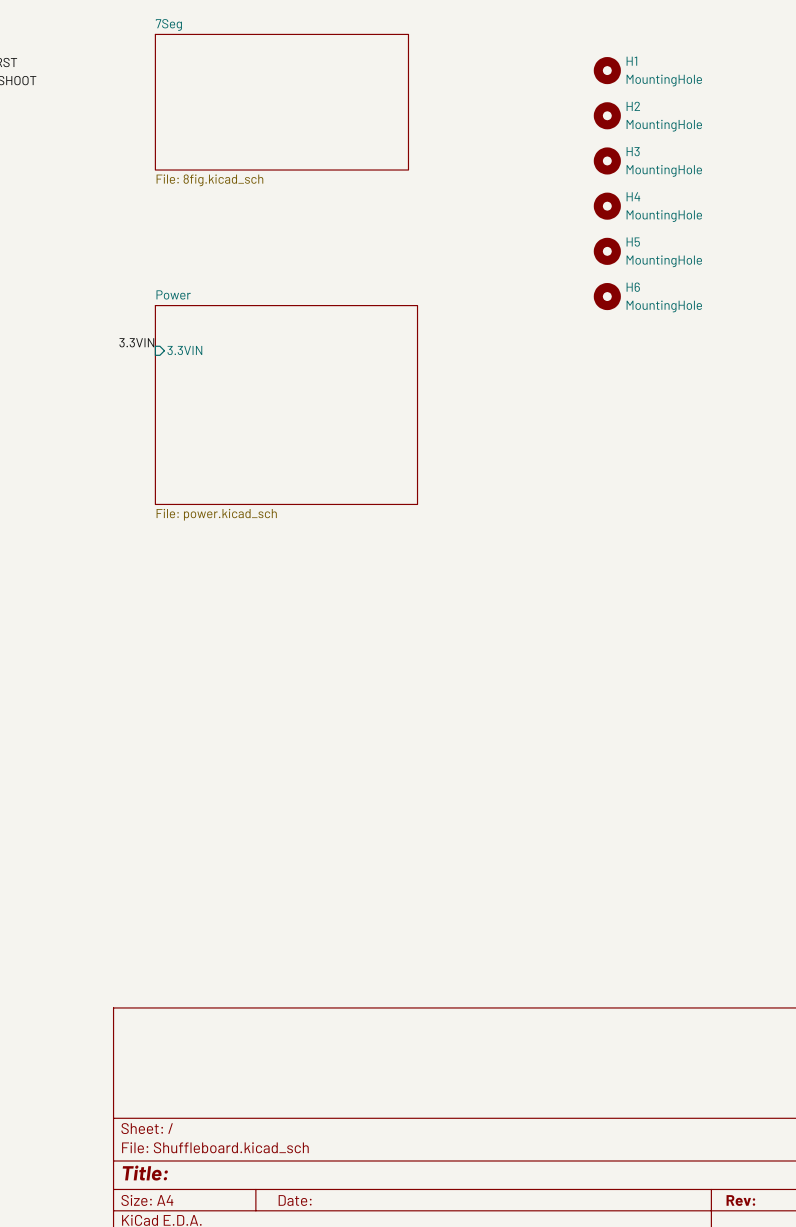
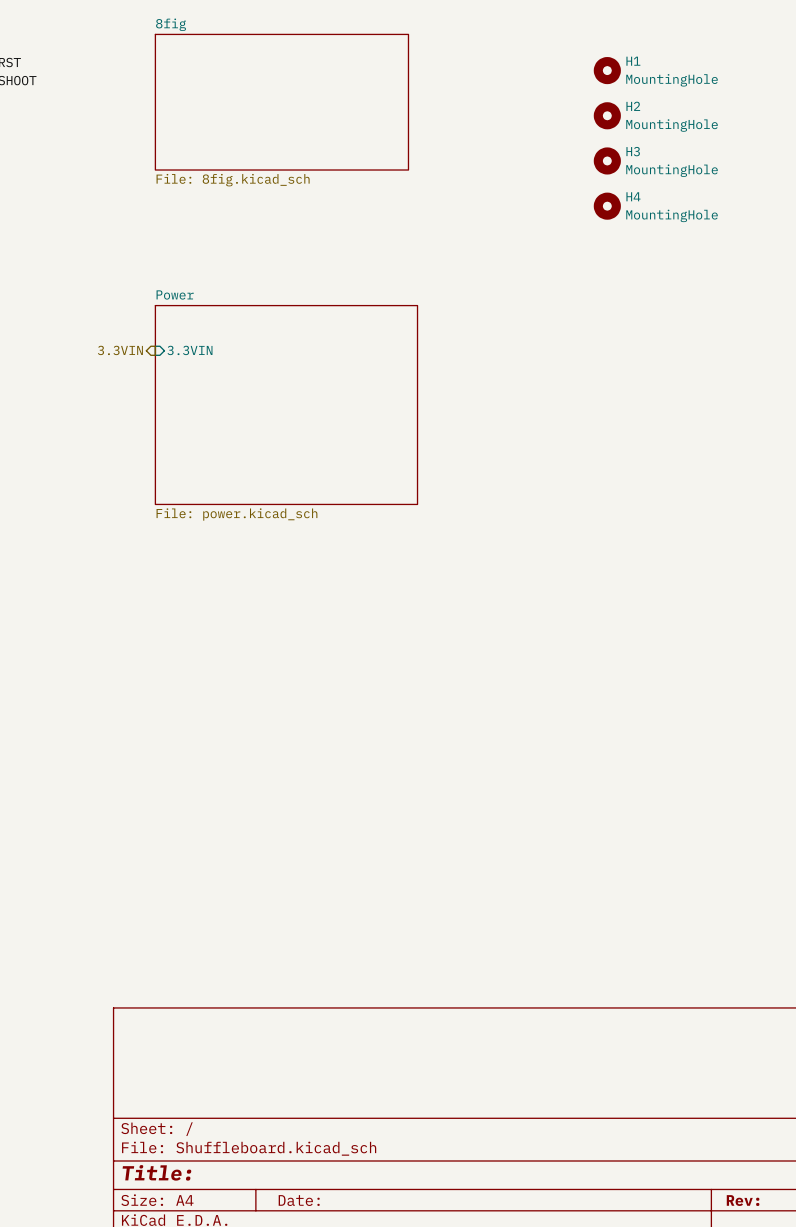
sheet 7Seg name: 7Seg (168, 24) -> 8fig (171, 24)
H5: MountingHole (607, 251) -> none
H6: MountingHole (607, 296) -> none
label: 3.3VIN (136, 342) -> none
hierarchical label: none -> 3.3VIN (120, 350)

